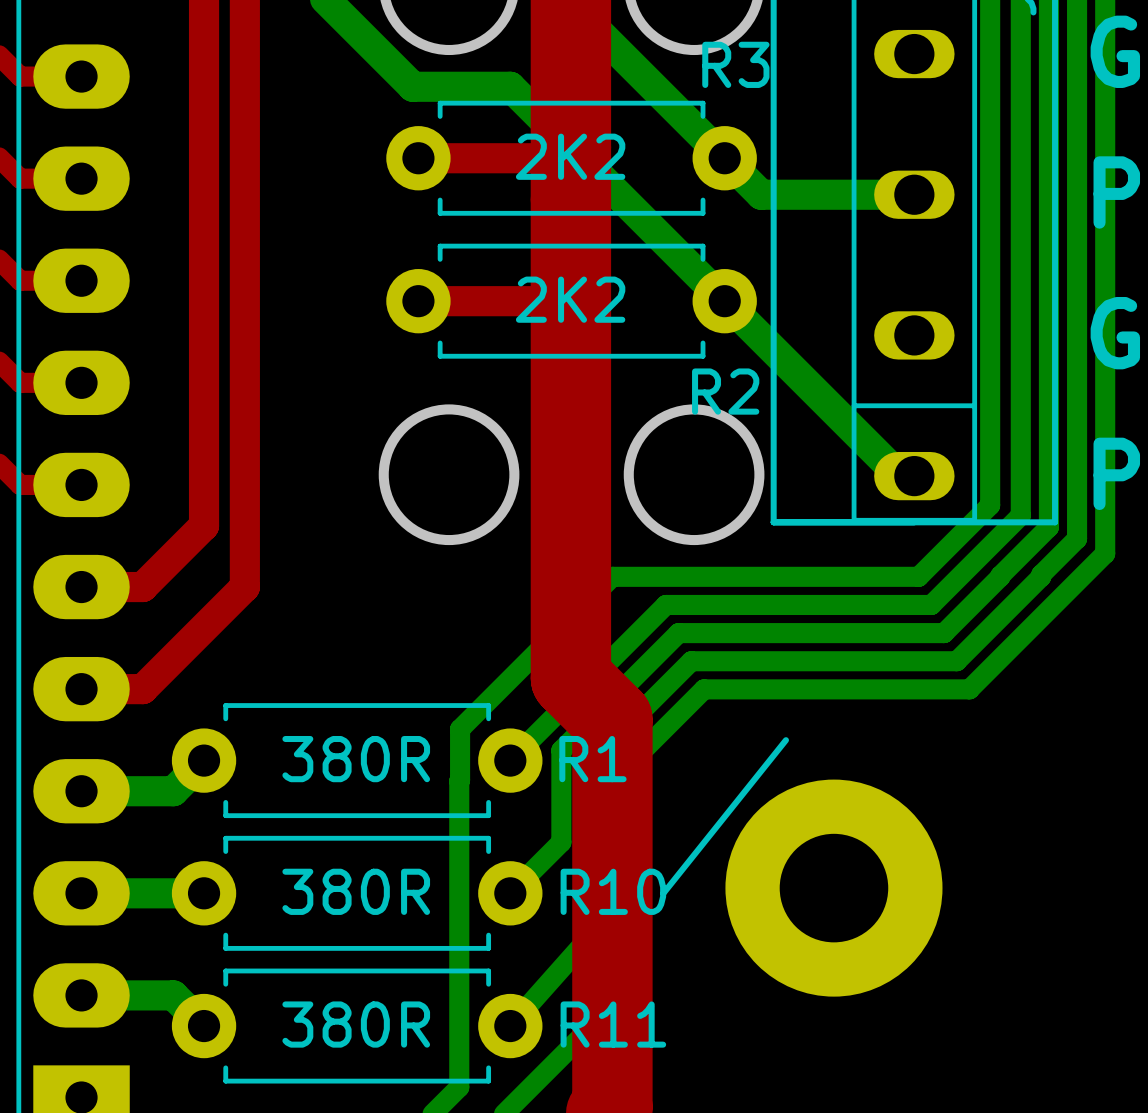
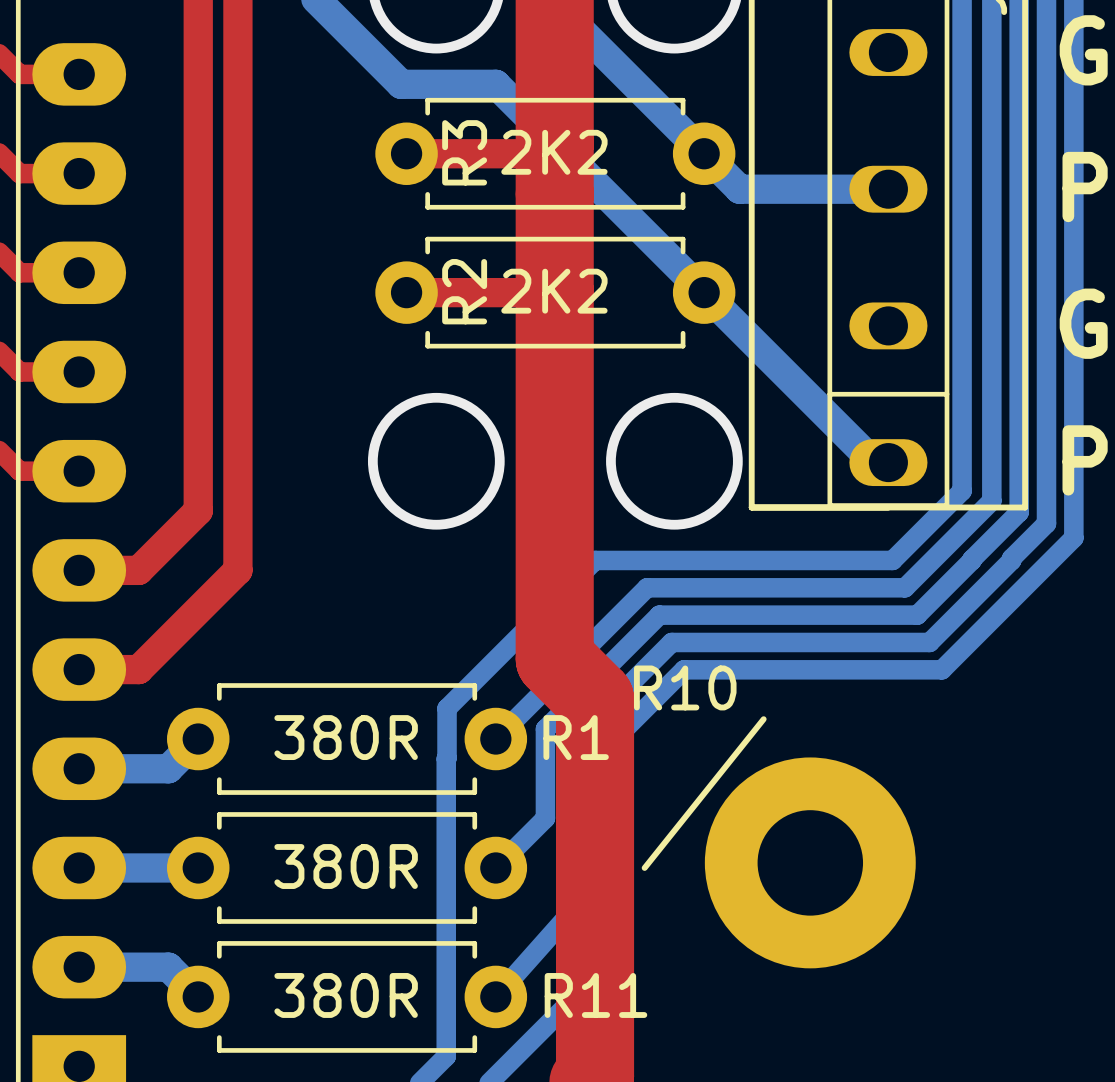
R3 name rotation: 0° (735, 64) -> 90° counterclockwise (464, 152)
R3 name position: R3 (735, 64) -> R3 (464, 152)
R2 name rotation: 0° (725, 391) -> 90° counterclockwise (464, 291)
R2 name position: R2 (725, 391) -> R2 (464, 291)
R10 name position: R10 (613, 891) -> R10 (685, 687)

